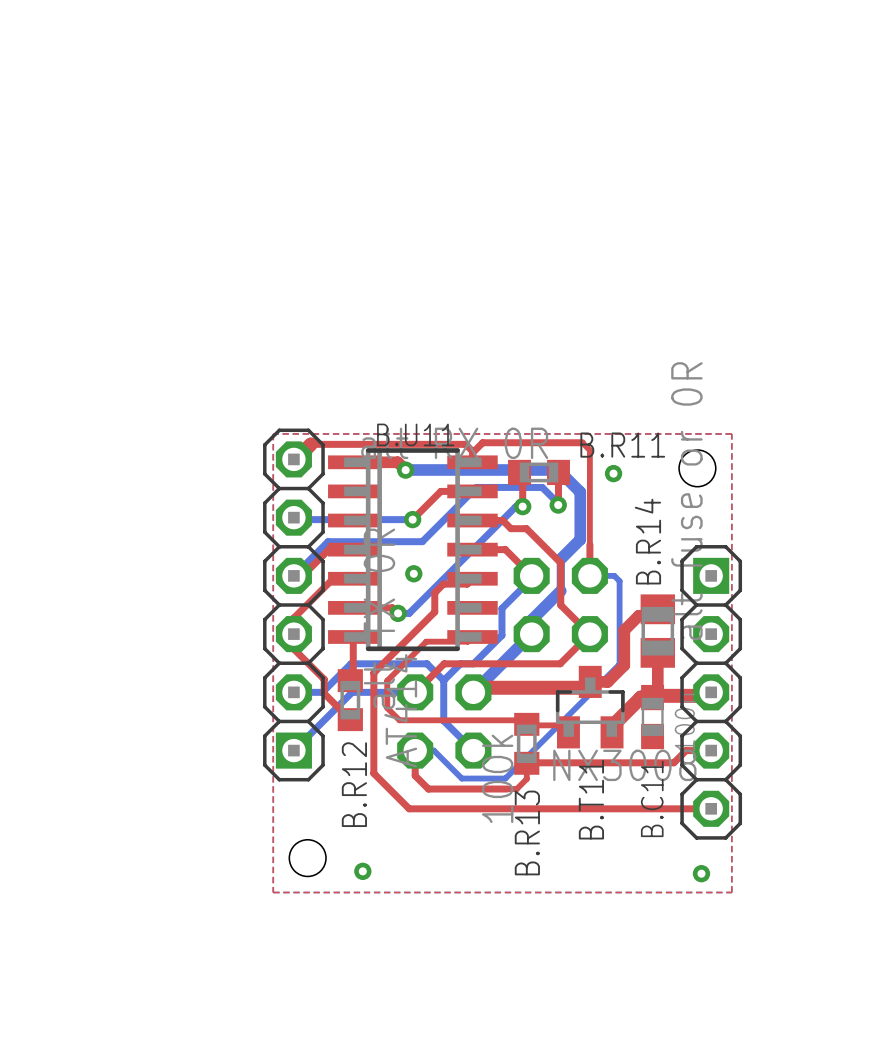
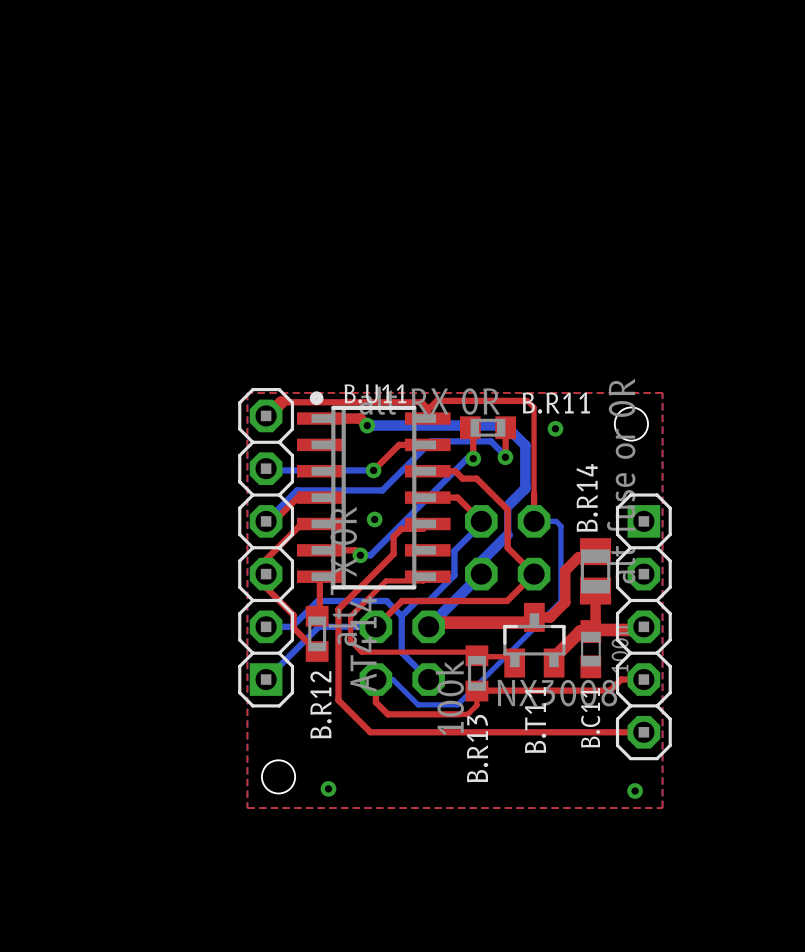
drawing: none -> [309, 391, 324, 406]

